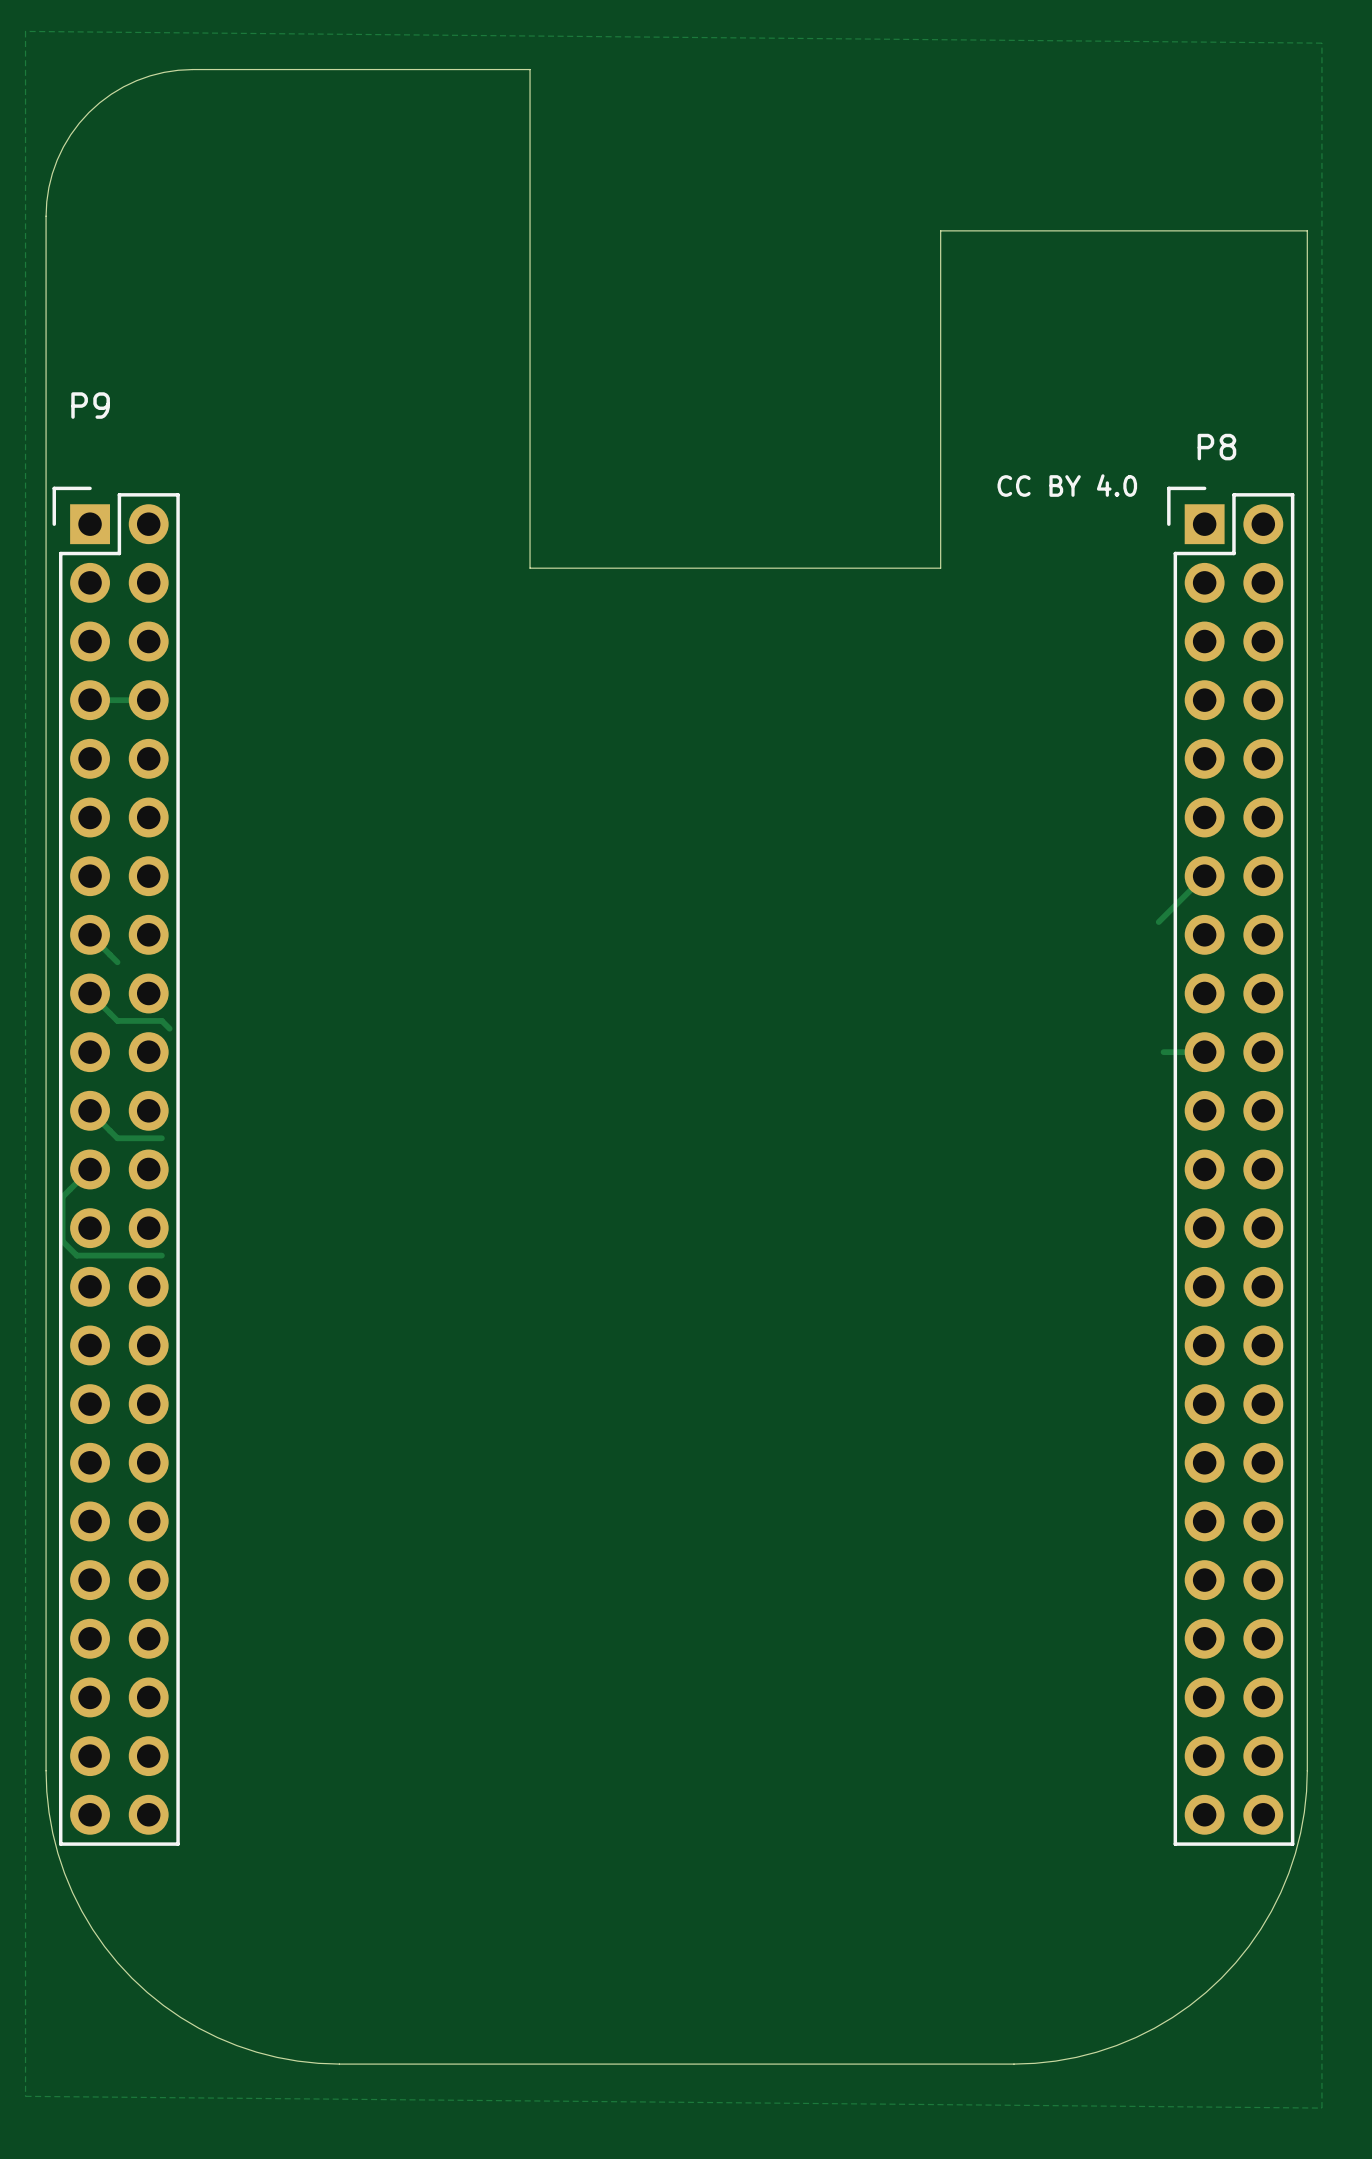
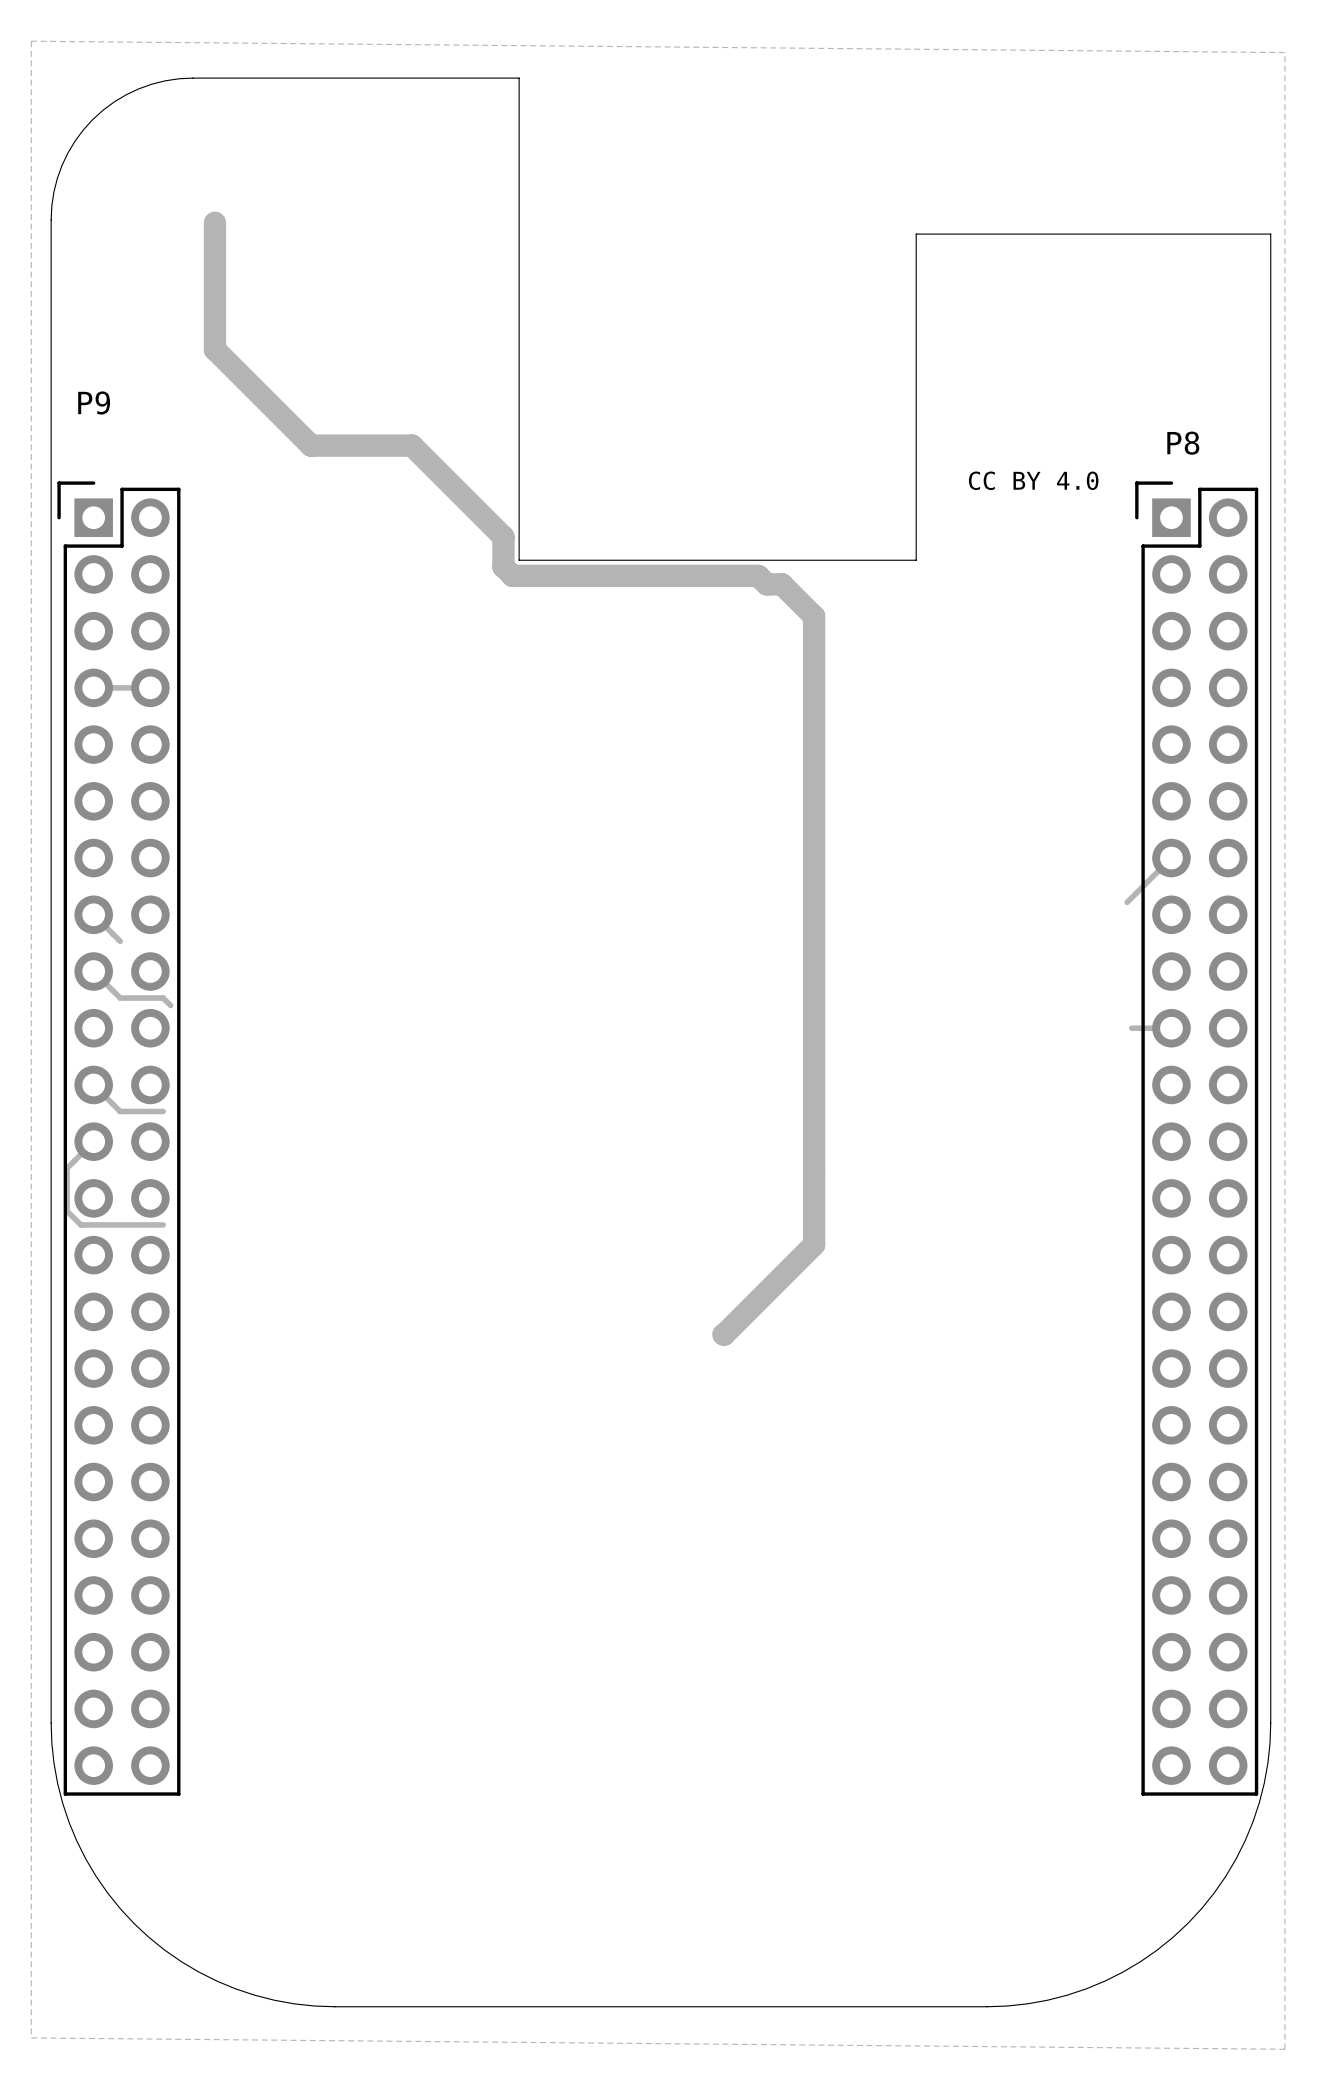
track: none -> (214, 222) (214, 349) (311, 445) (412, 445) (503, 537) (503, 566) (512, 575) (758, 575) (766, 584) (782, 584) (814, 616) (814, 1244) (723, 1334)

